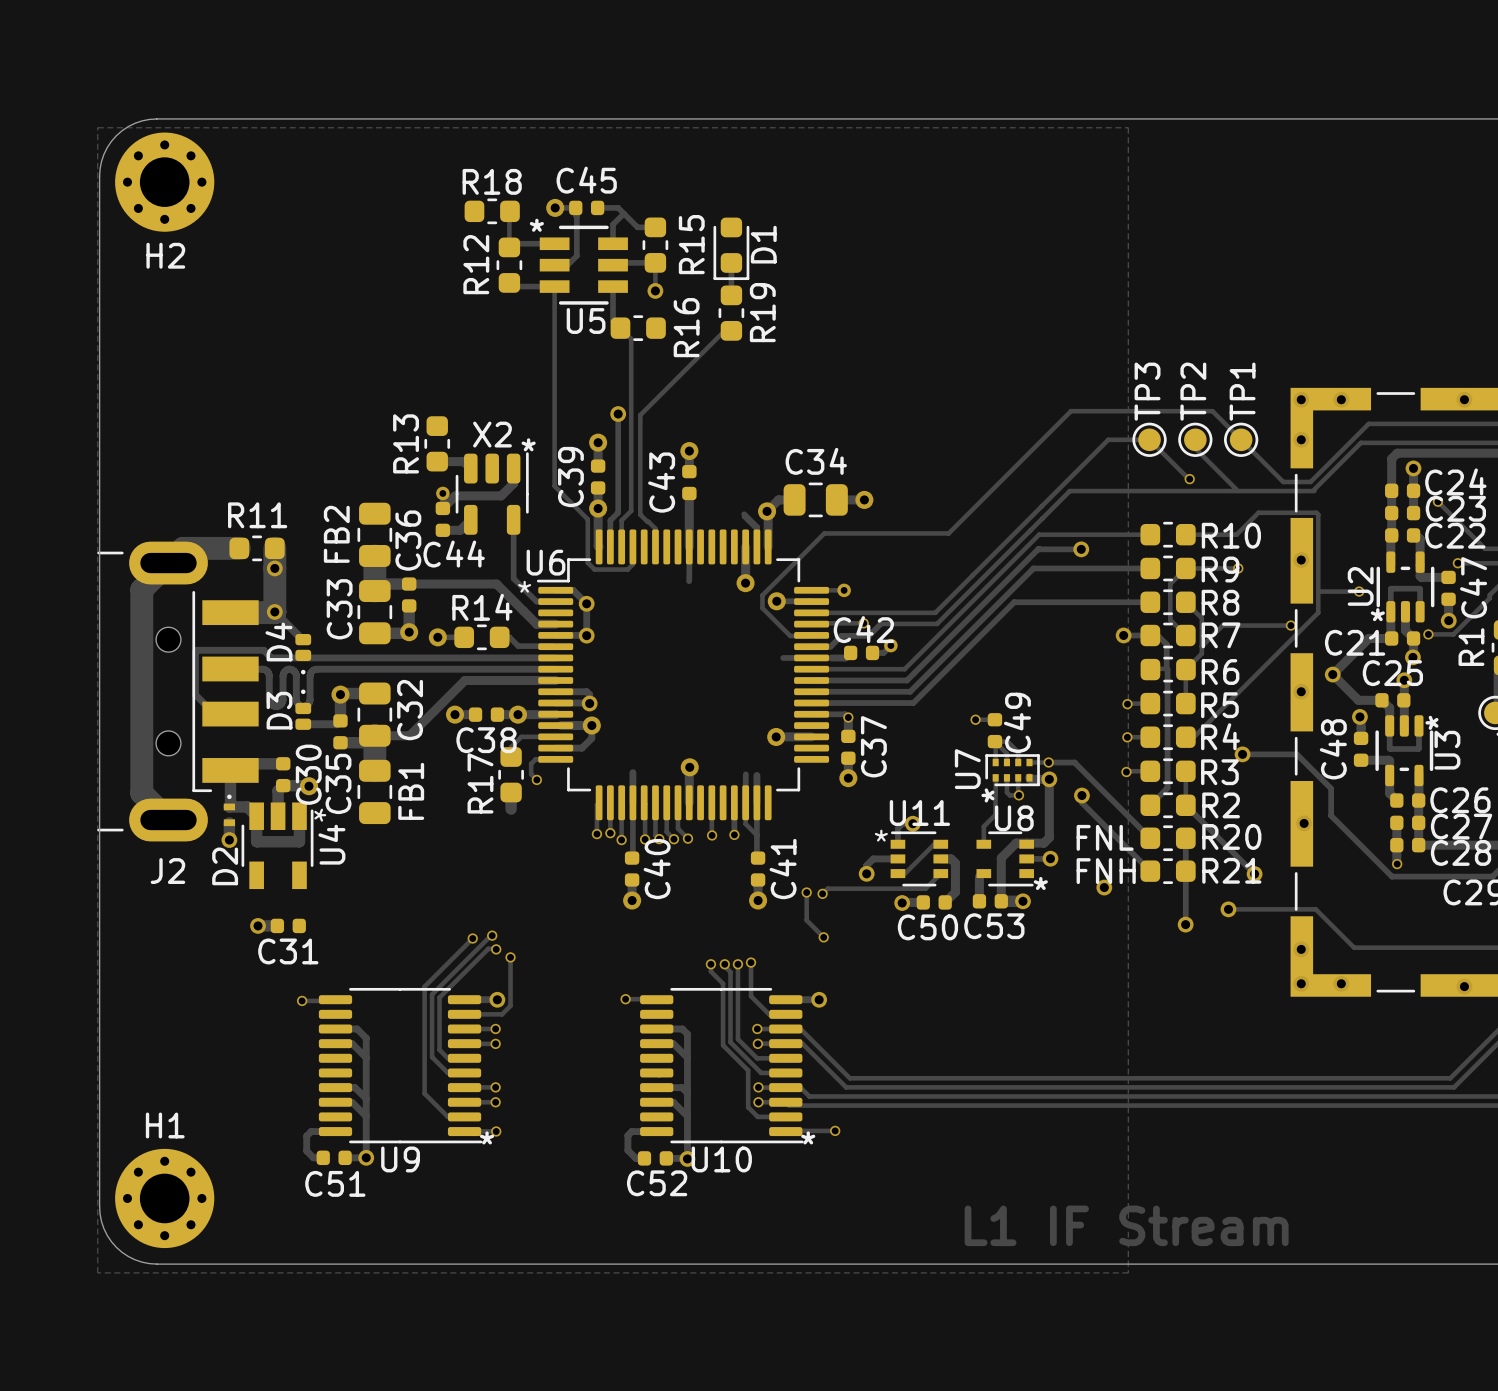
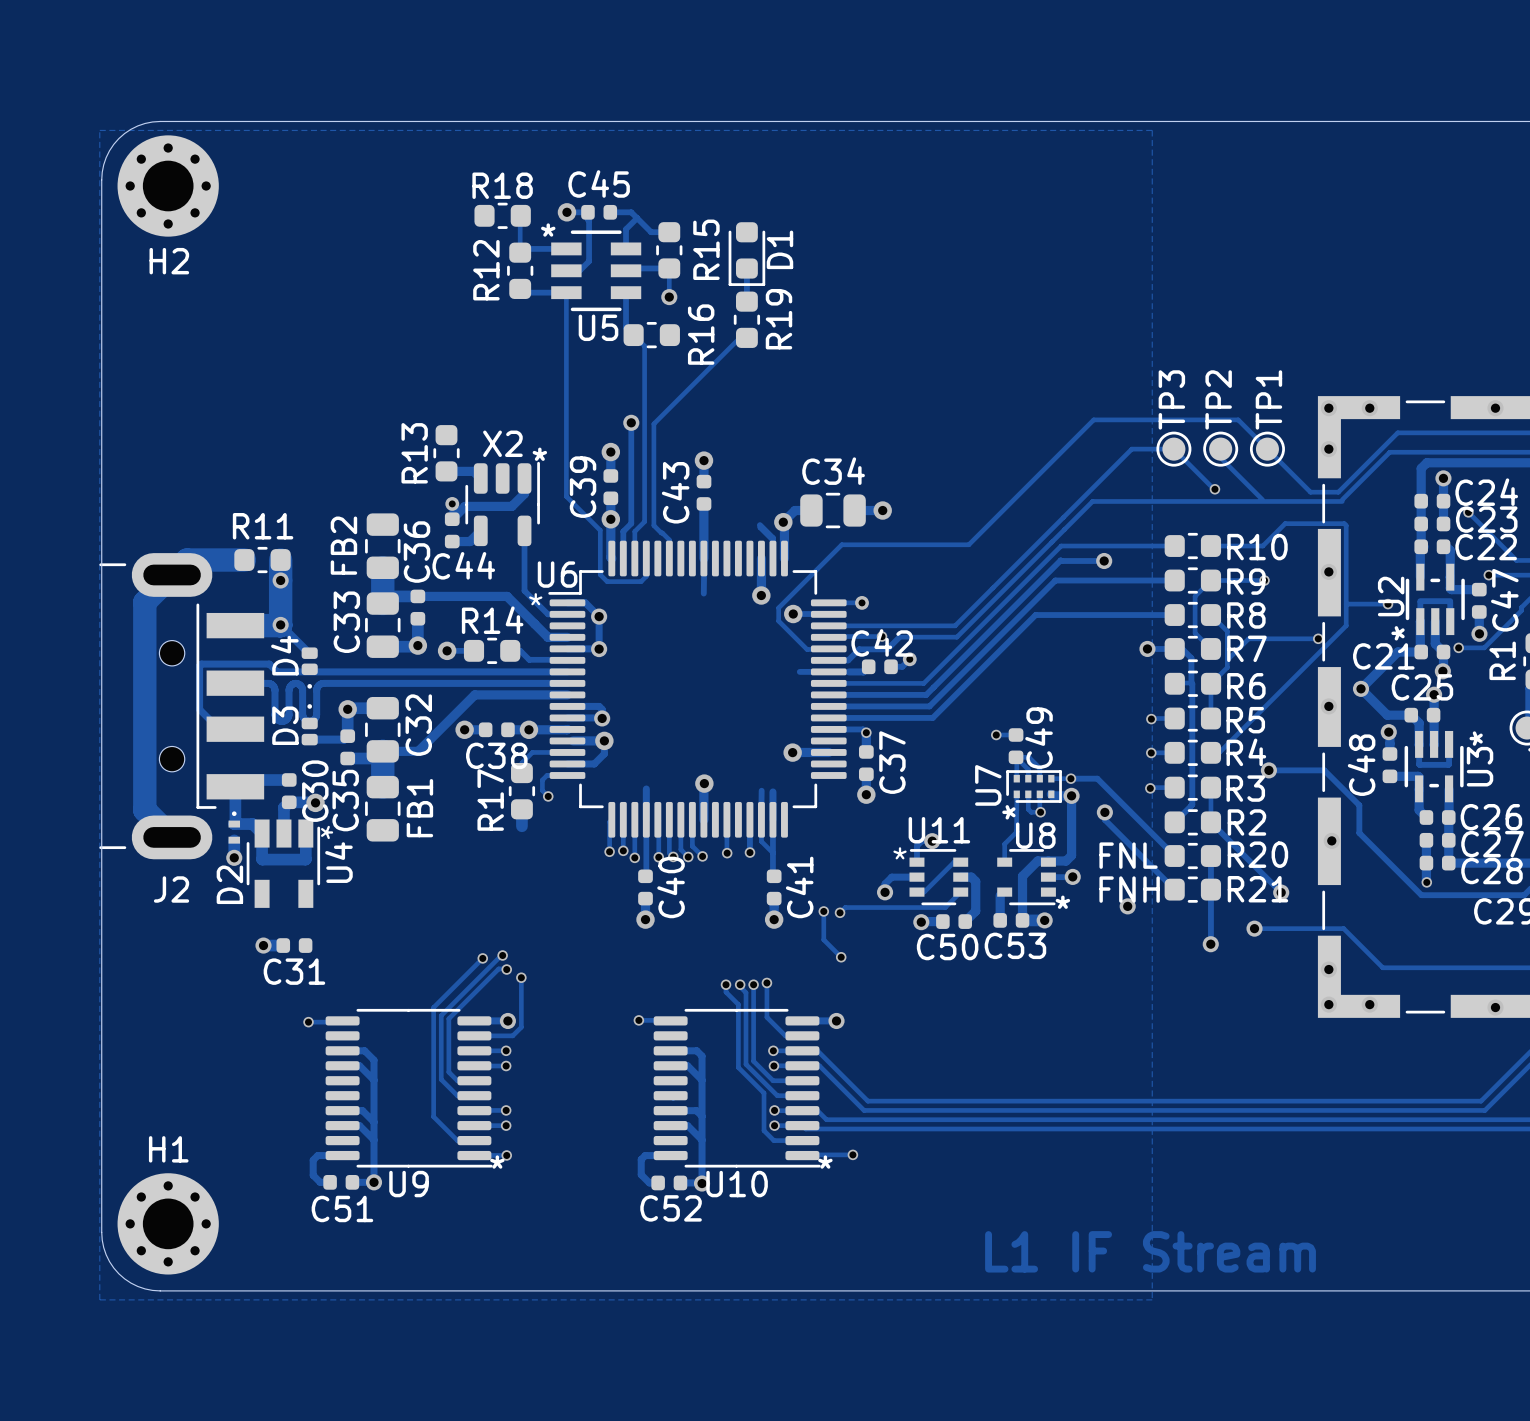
U2 footprint: [1376, 551, 1435, 623] -> [1405, 563, 1465, 636]
U3 footprint: [1375, 715, 1434, 787] -> [1404, 730, 1464, 803]

